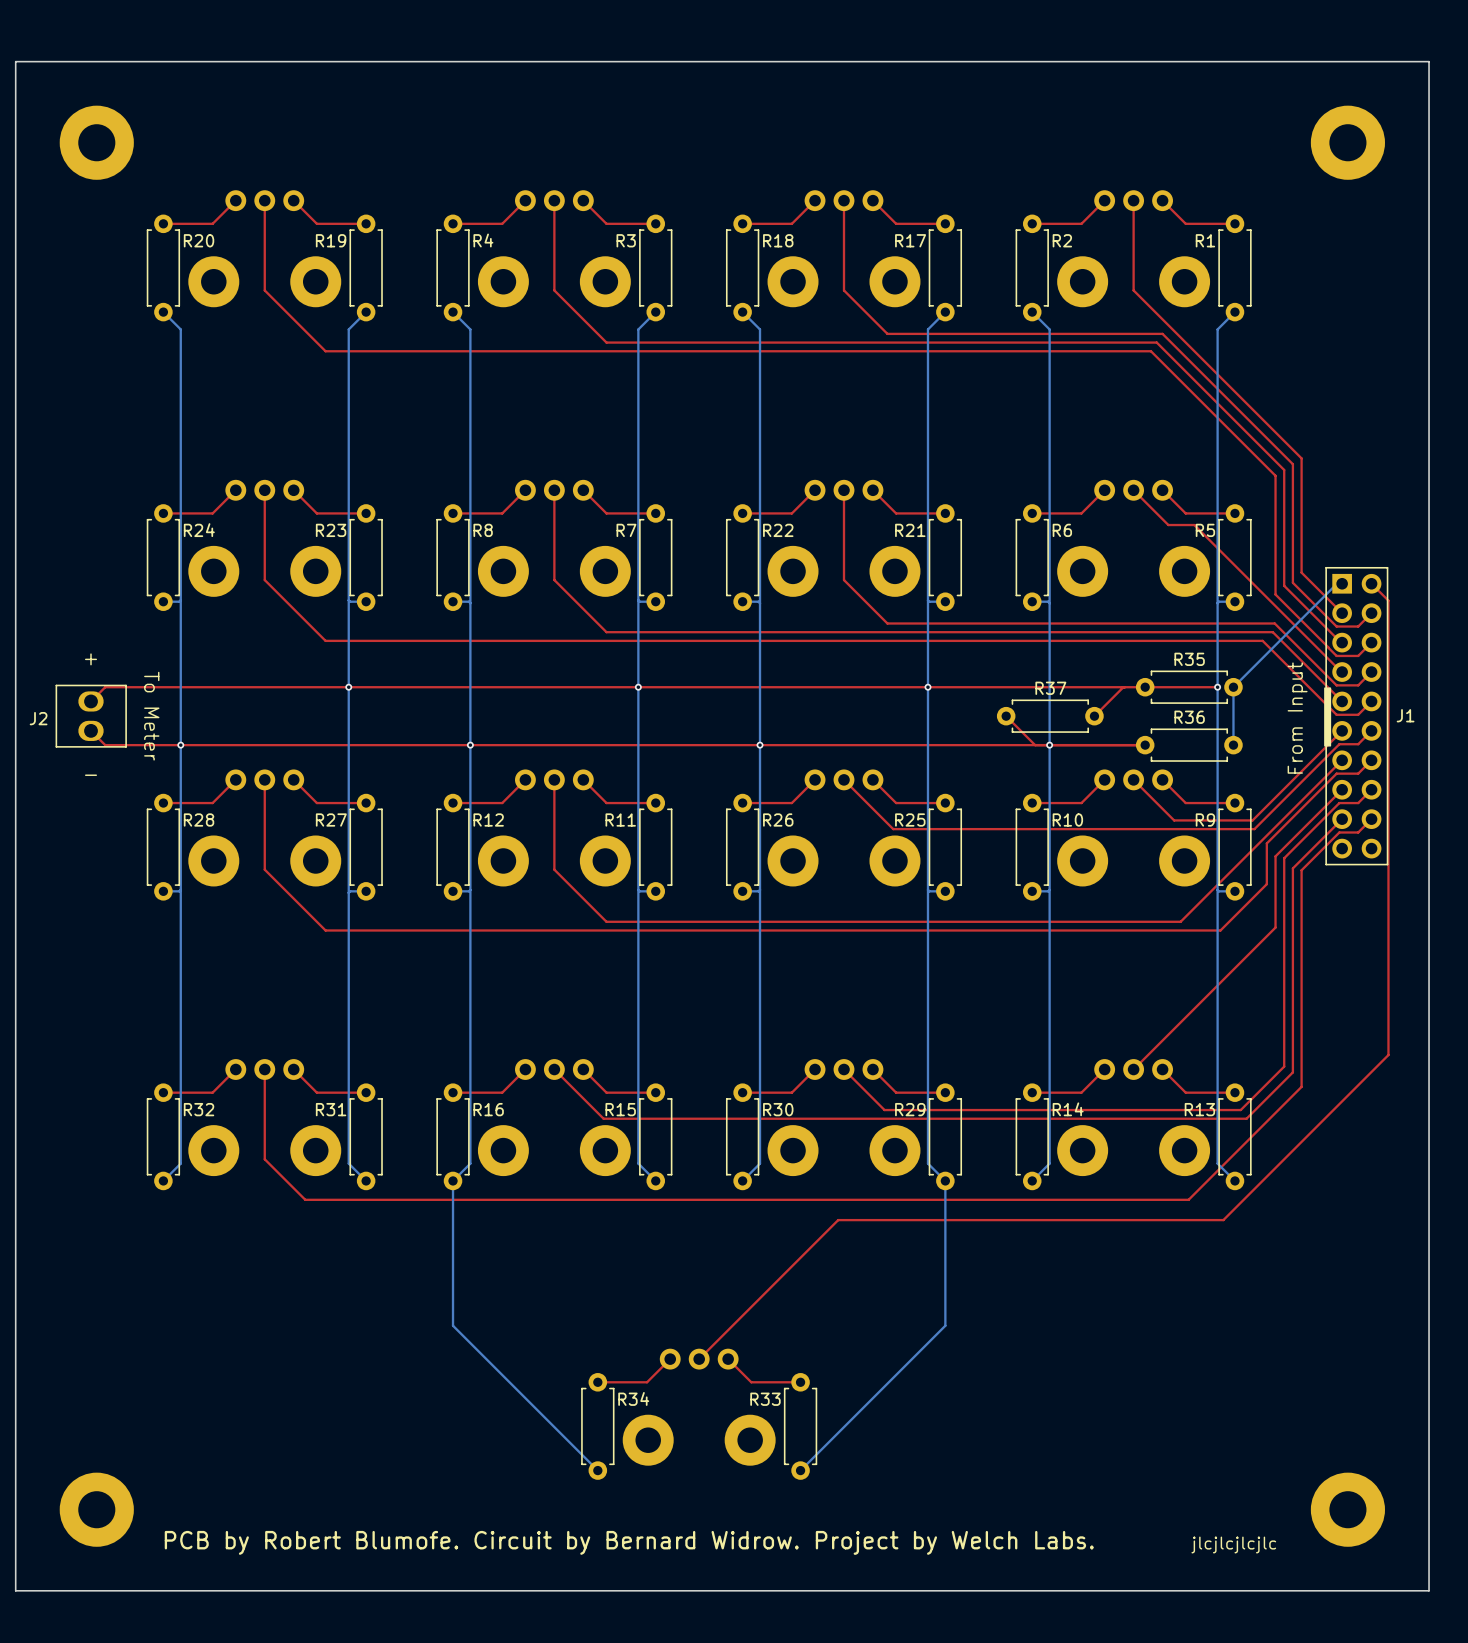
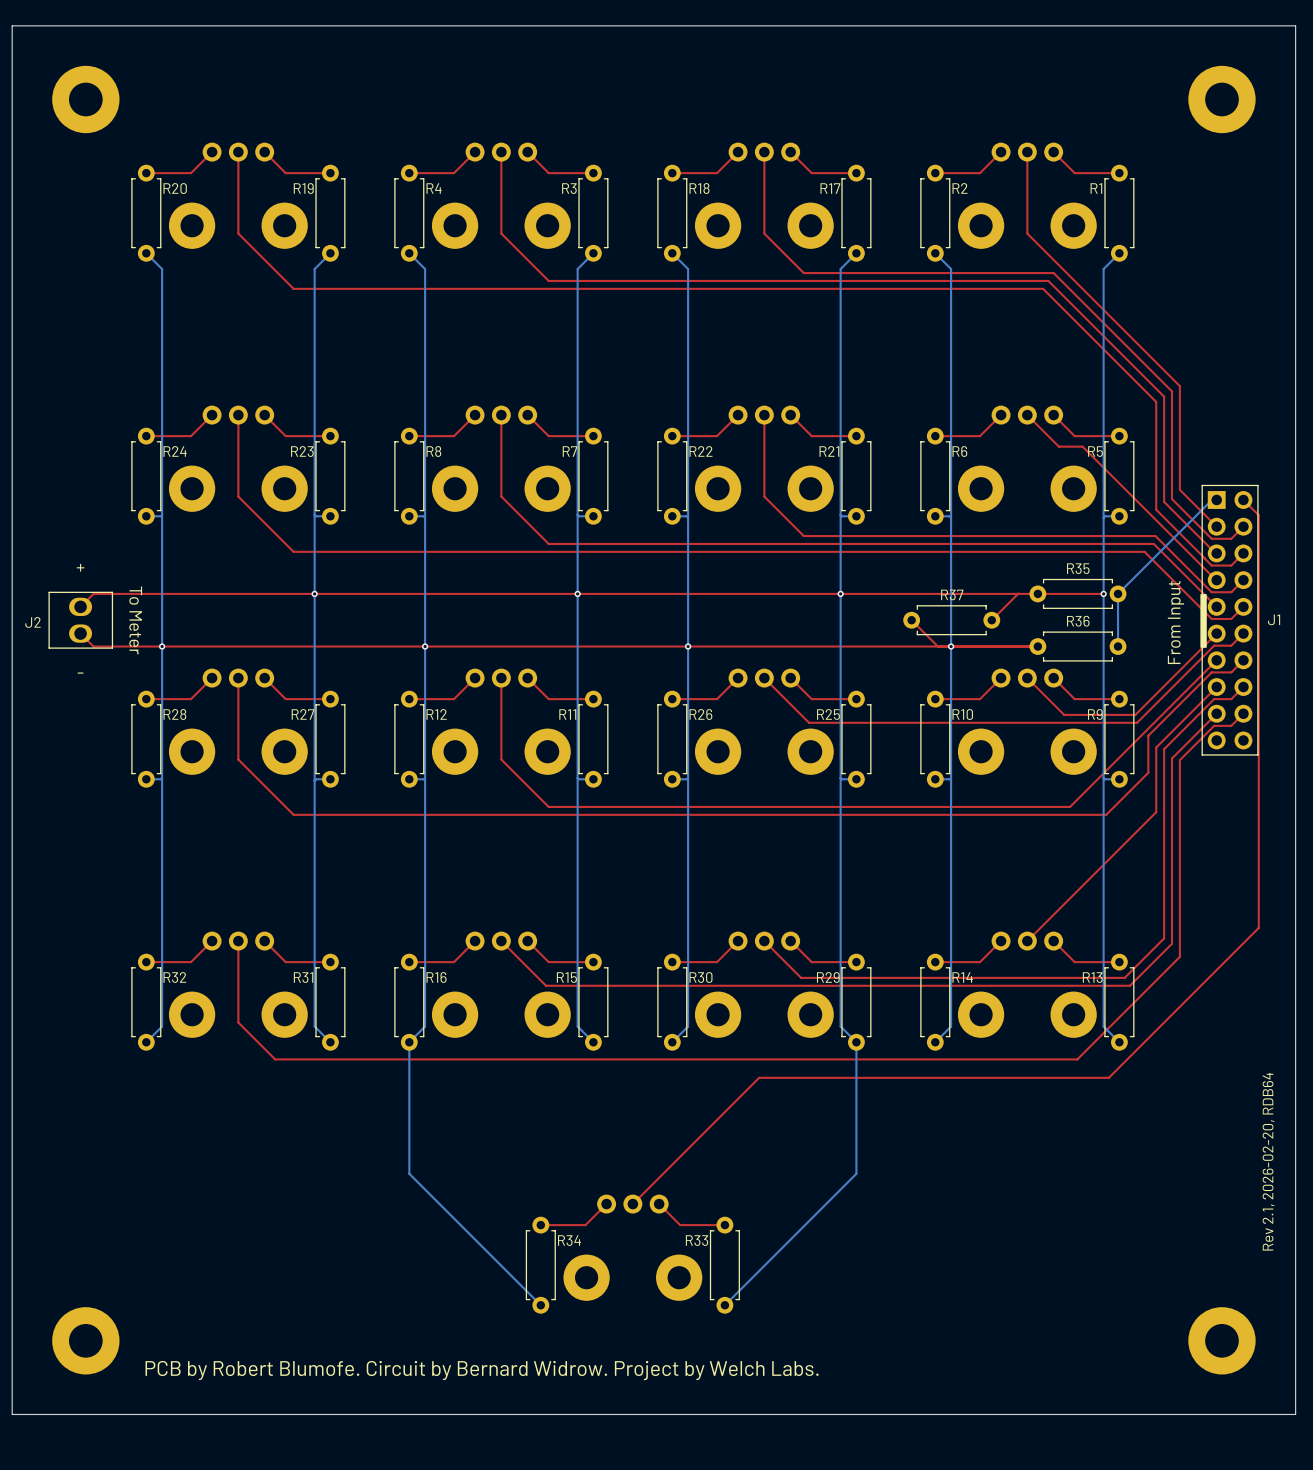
text: none -> Rev 2.1, 2026-02-20, RDB64 (1268, 1161)
text: jlcjlcjlcjlc (1233, 1544) -> none

